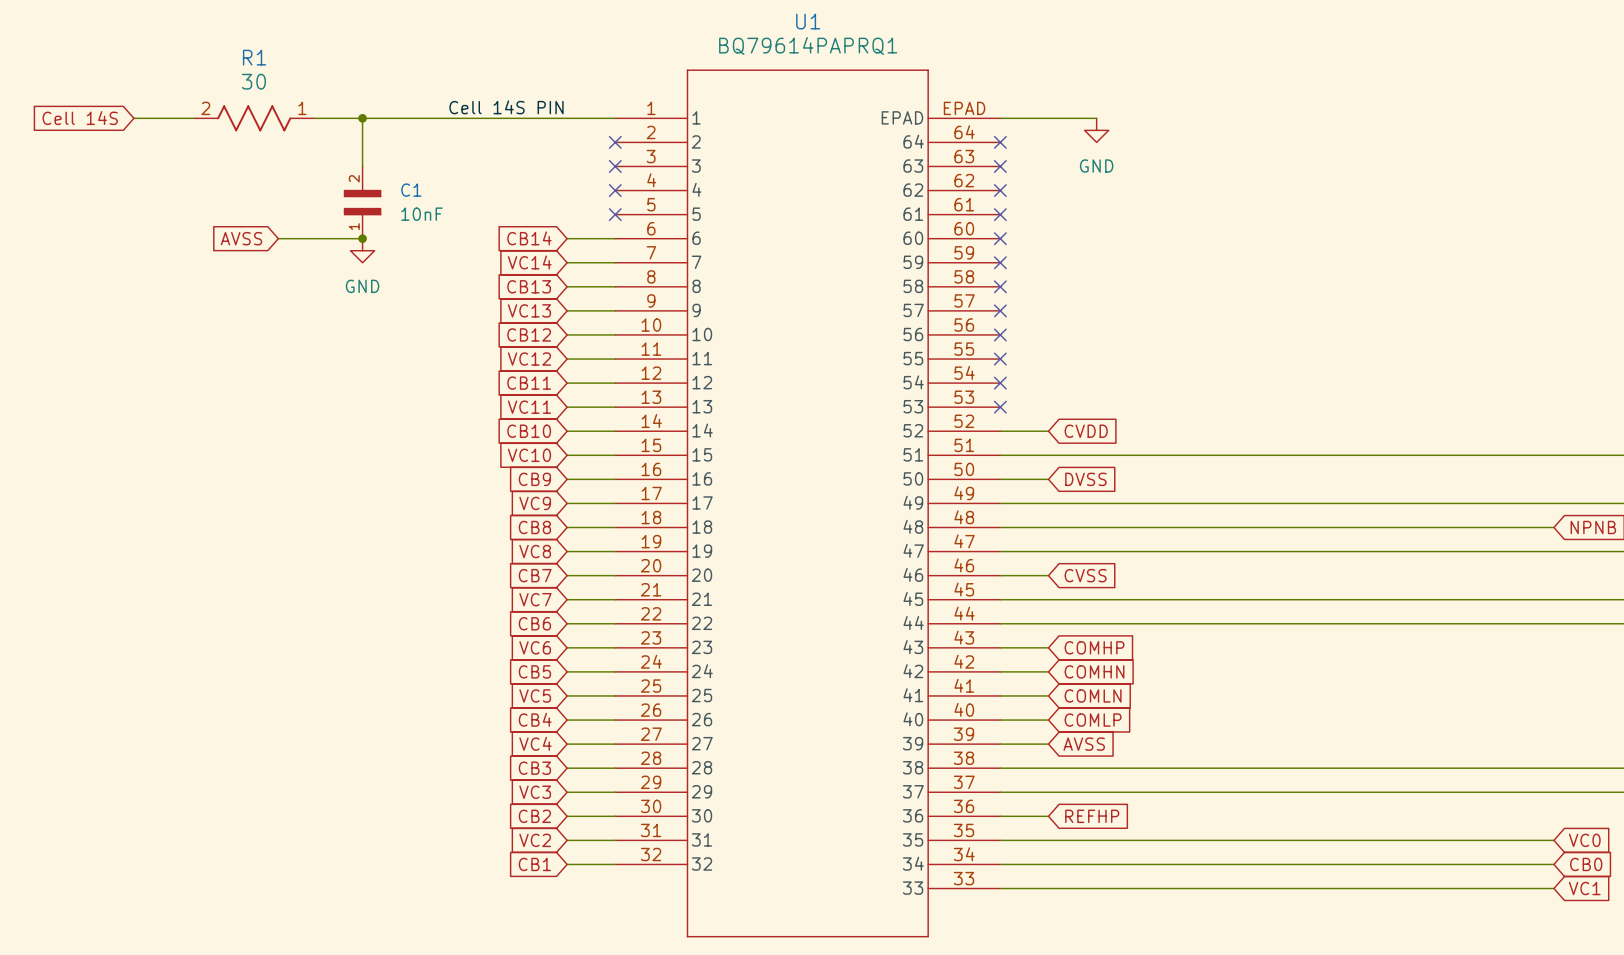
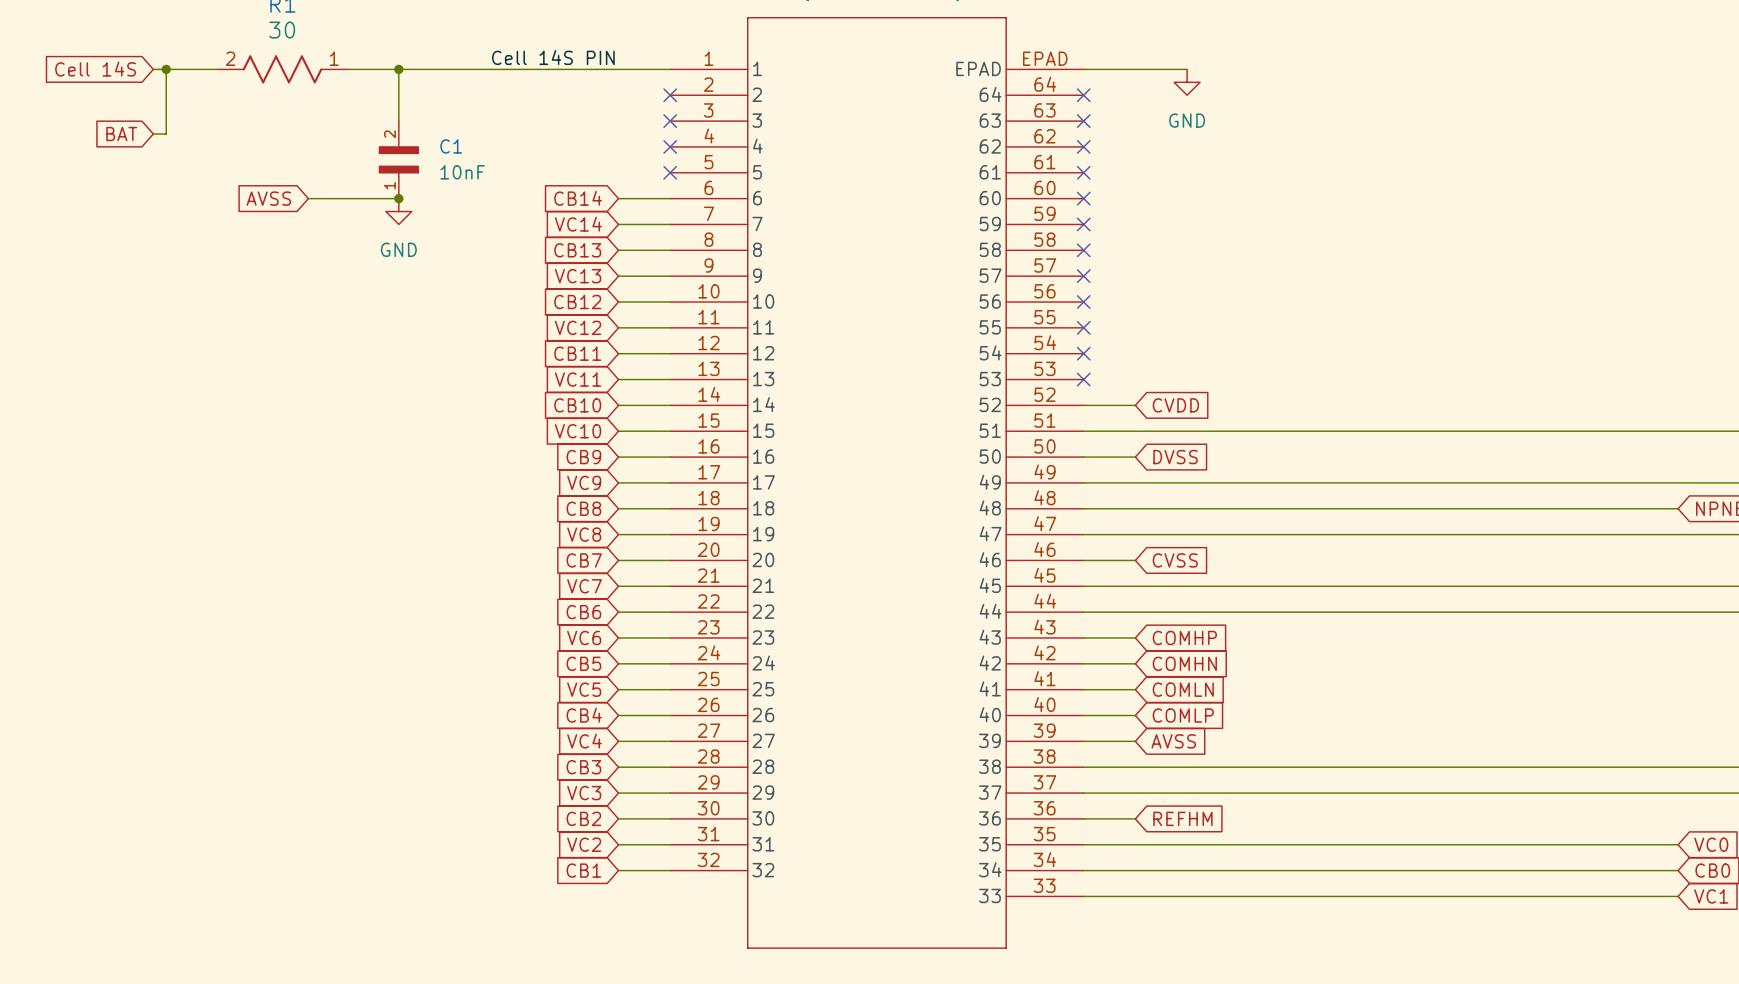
wire: none -> (166, 69) (166, 134) (153, 134)
junction: none -> (166, 69)
global label: none -> BAT (121, 134)
global label: REFHP (1092, 816) -> REFHM (1182, 818)

